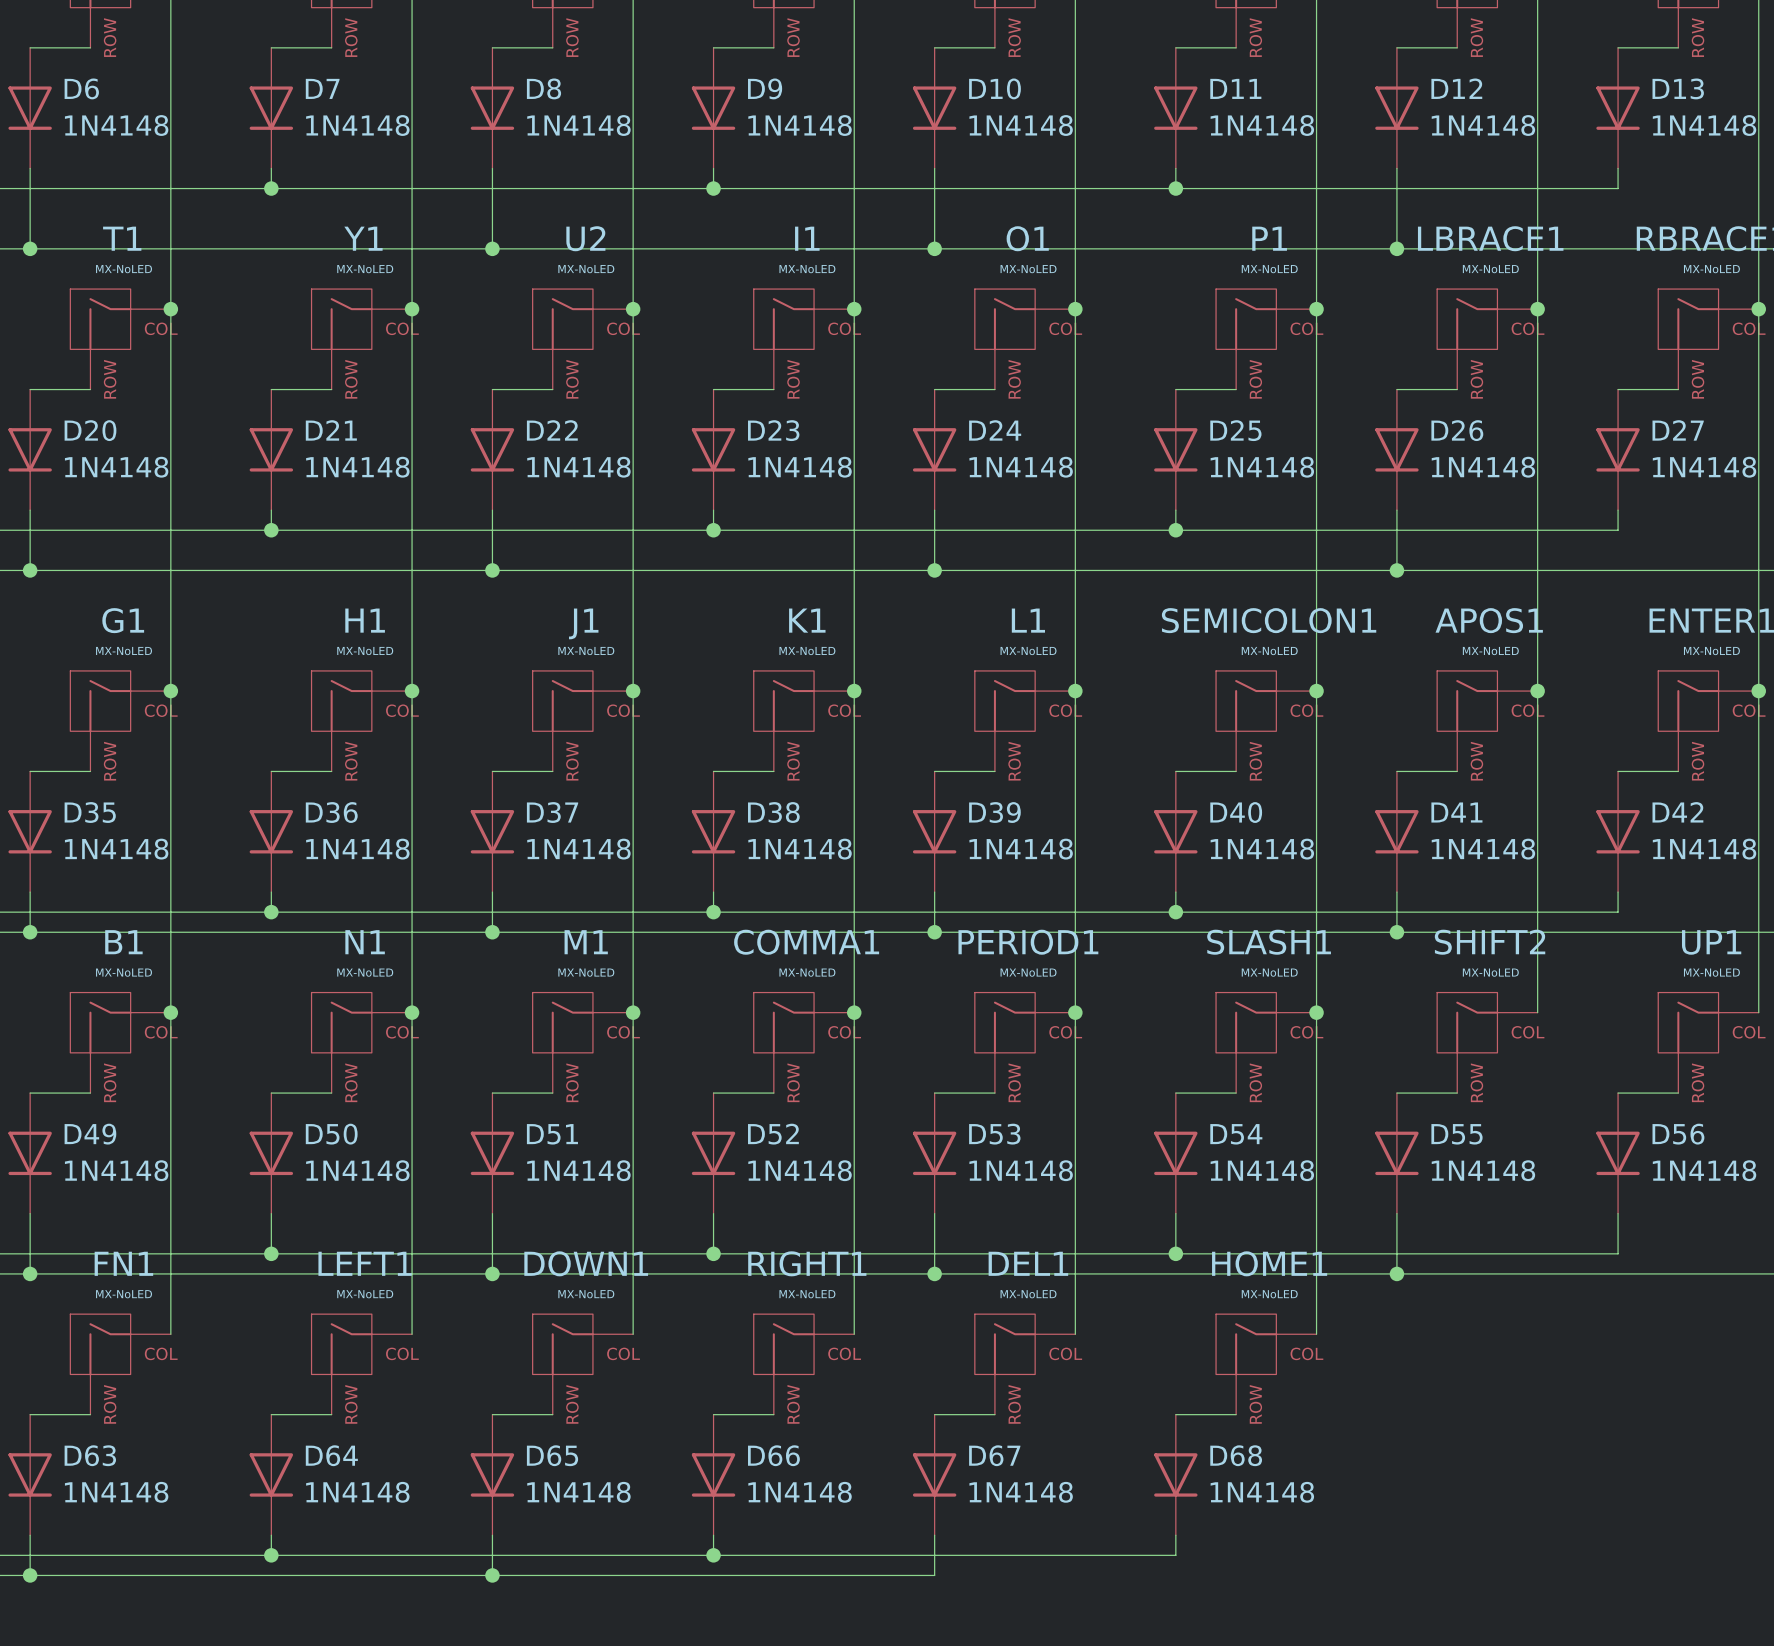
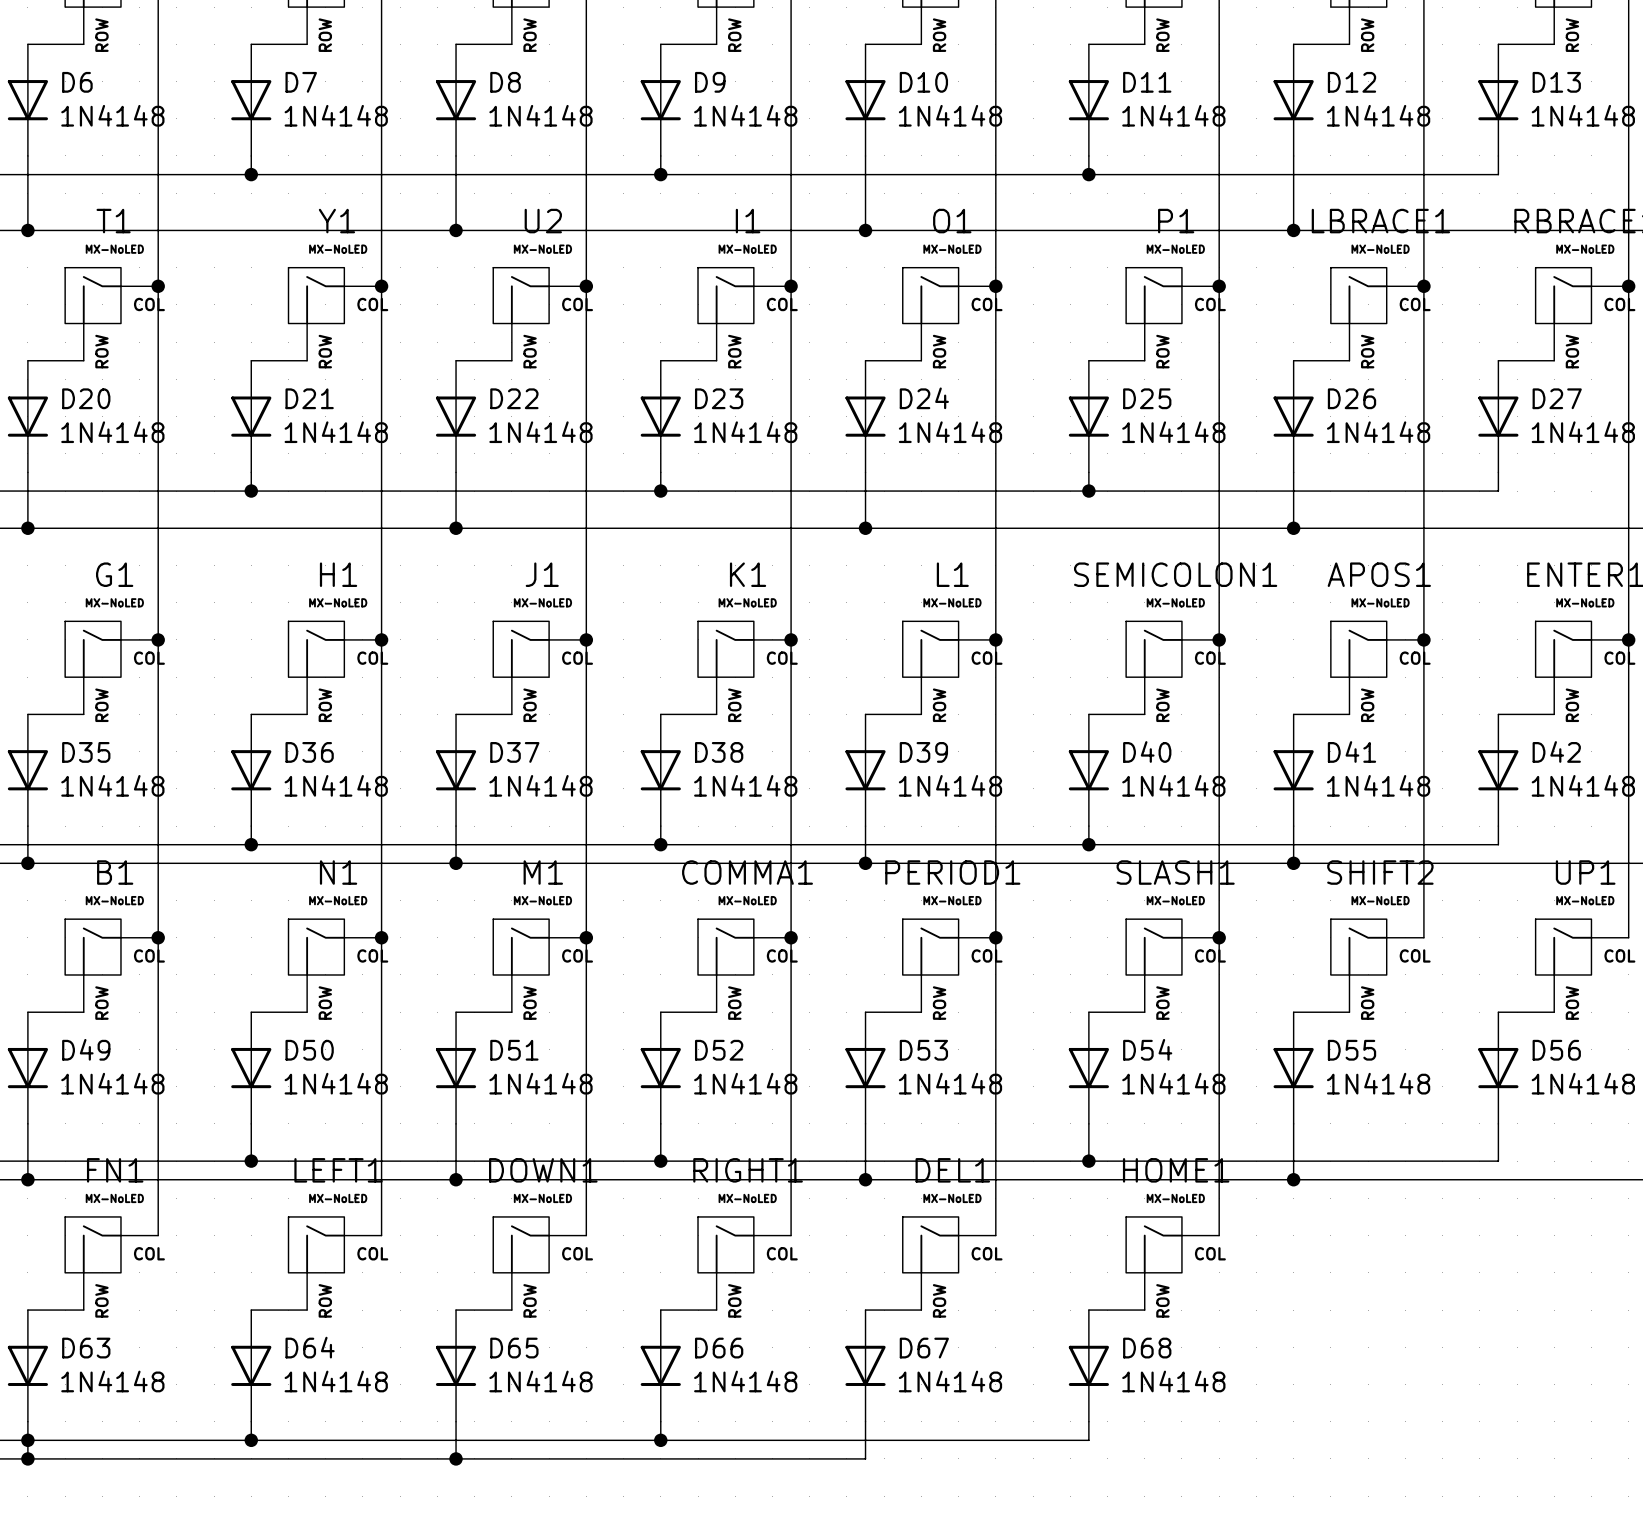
junction: none -> (27, 1440)

